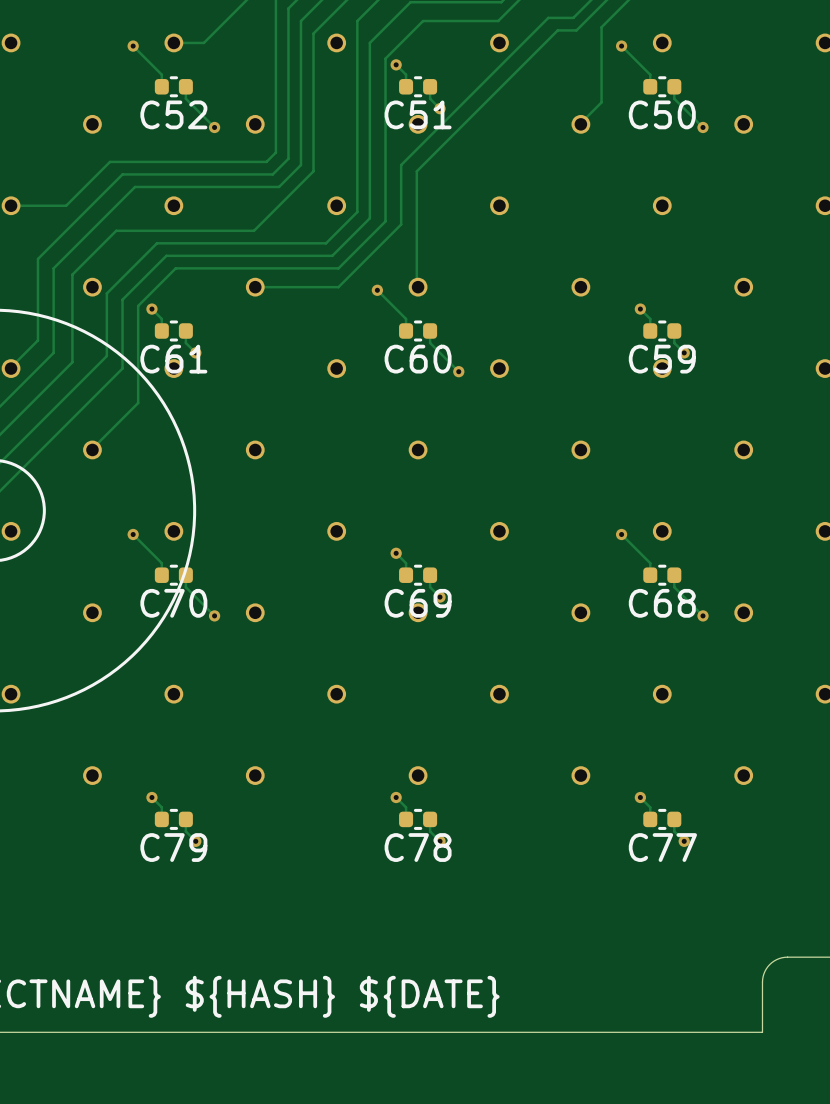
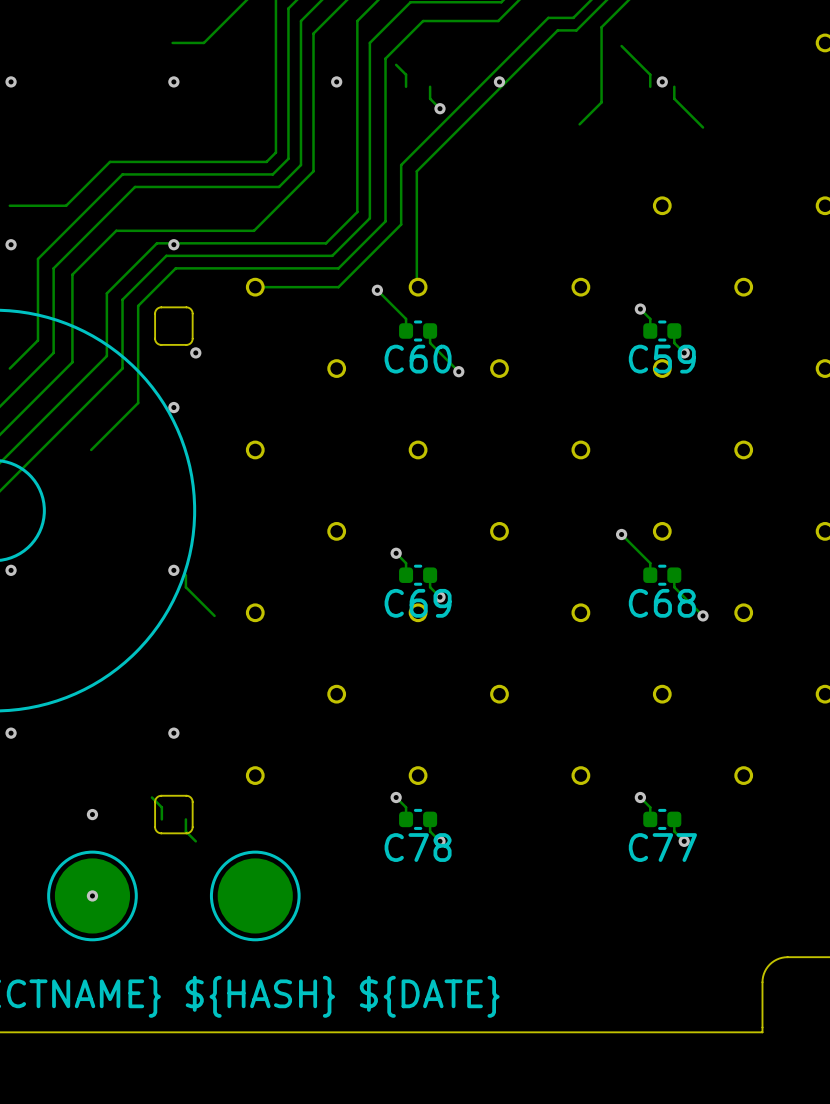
part: (11, 42) -> none
part: (173, 42) -> none
part: (336, 42) -> none
part: (499, 42) -> none
part: (662, 42) -> none
track: (133, 46) (161, 74) (161, 86) -> none
via: (133, 46) -> none
via: (621, 46) -> none
via: (396, 64) -> none
via: none -> (11, 81)
via: none -> (173, 81)
via: none -> (336, 81)
via: none -> (499, 81)
via: none -> (662, 81)
C52: (173, 86) -> none
track: (185, 86) (185, 98) (214, 127) -> none
C51: (418, 86) -> none
C50: (662, 86) -> none
part: (92, 124) -> none
part: (255, 124) -> none
part: (418, 124) -> none
part: (580, 124) -> none
part: (743, 124) -> none
via: (214, 127) -> none
via: (702, 127) -> none
part: (11, 205) -> none
part: (173, 205) -> none
part: (336, 205) -> none
part: (499, 205) -> none
via: none -> (11, 244)
via: none -> (173, 244)
part: (92, 287) -> none
board edge: none -> (186, 307) (160, 307) (156, 309) (155, 338) (157, 343) (186, 344) (191, 342) (192, 312) (190, 308) (186, 307)
track: (151, 309) (161, 318) (161, 330) -> none
via: (151, 309) -> none
C61: (173, 330) -> none
track: (185, 330) (185, 343) (195, 352) -> none
part: (11, 368) -> none
part: (173, 368) -> none
via: none -> (173, 407)
part: (92, 449) -> none
part: (11, 531) -> none
part: (173, 531) -> none
track: (133, 534) (161, 563) (161, 575) -> none
via: (133, 534) -> none
via: none -> (11, 570)
via: none -> (173, 570)
C70: (173, 575) -> none
part: (92, 612) -> none
via: (214, 615) -> none
part: (11, 694) -> none
part: (173, 694) -> none
via: none -> (11, 733)
via: none -> (173, 733)
part: (92, 775) -> none
board edge: none -> (186, 795) (160, 795) (156, 798) (155, 827) (157, 831) (186, 833) (191, 830) (192, 801) (190, 797) (186, 795)
via: (151, 797) -> none
via: none -> (92, 814)
C79: (173, 819) -> none
via: (195, 841) -> none
part: none -> (92, 895)
via: none -> (92, 895)
part: none -> (255, 895)

